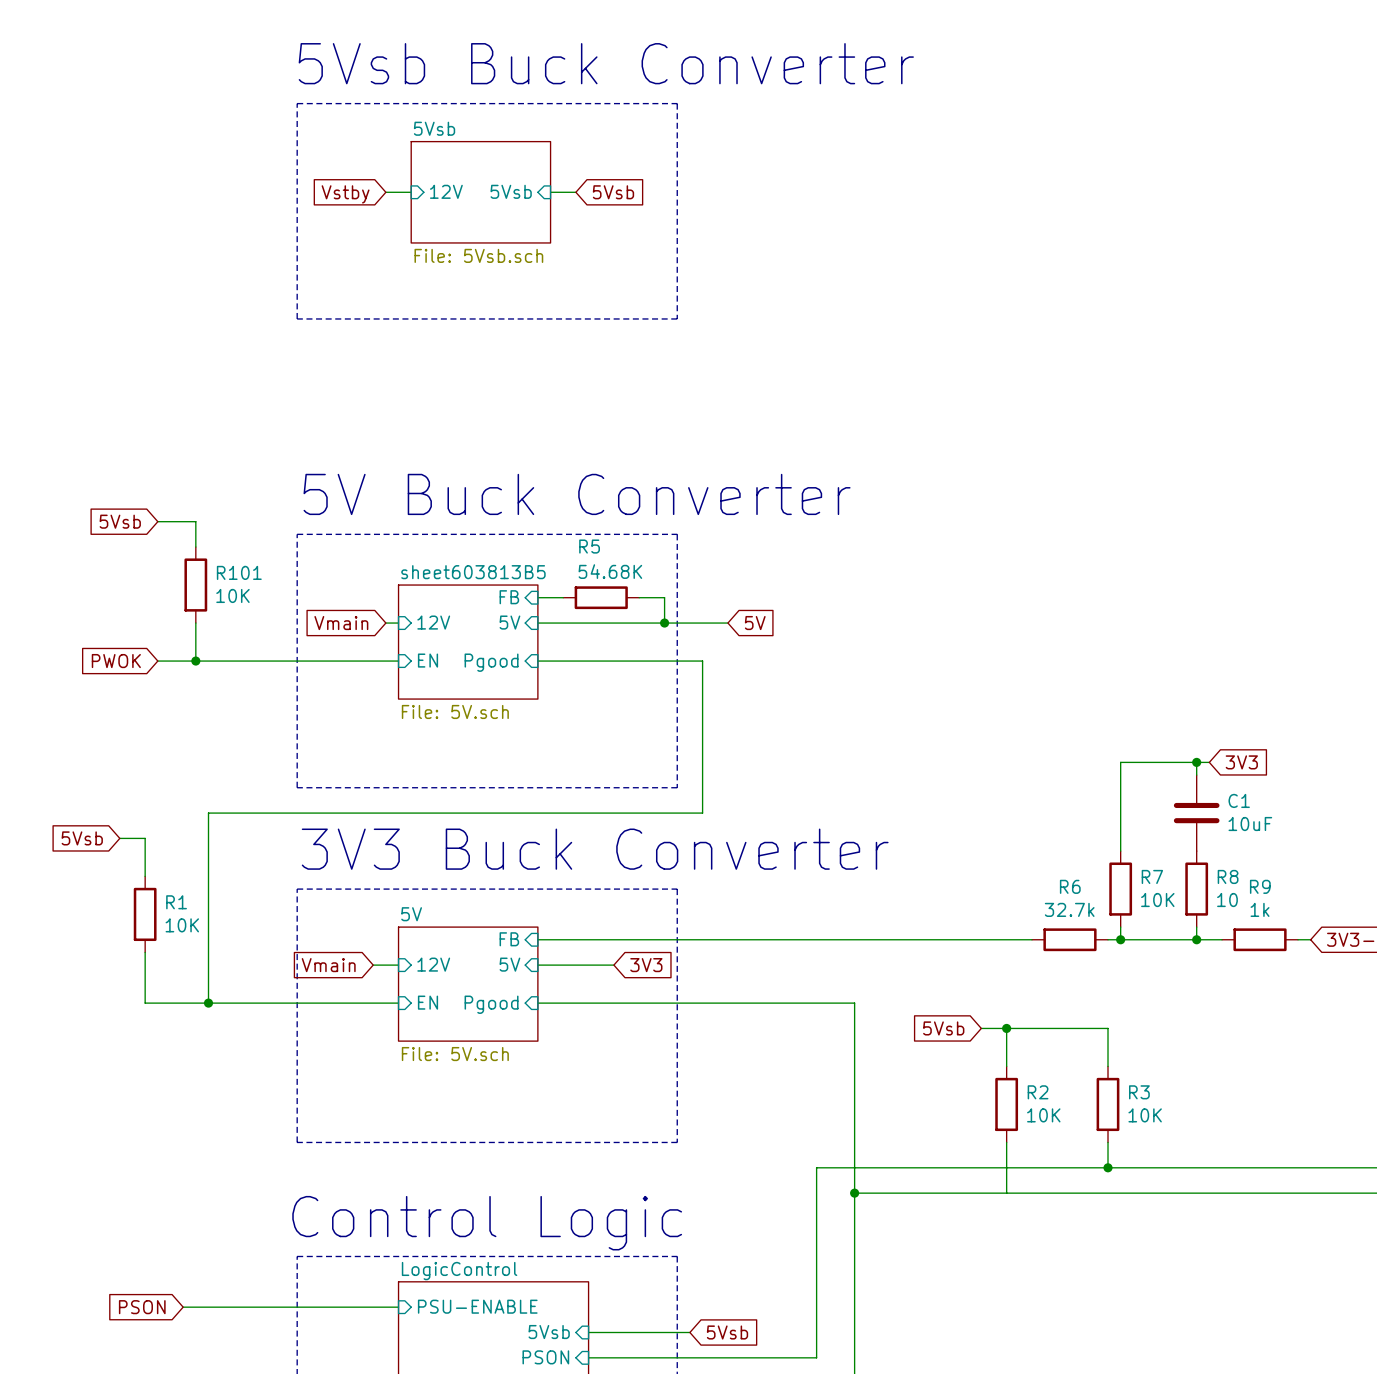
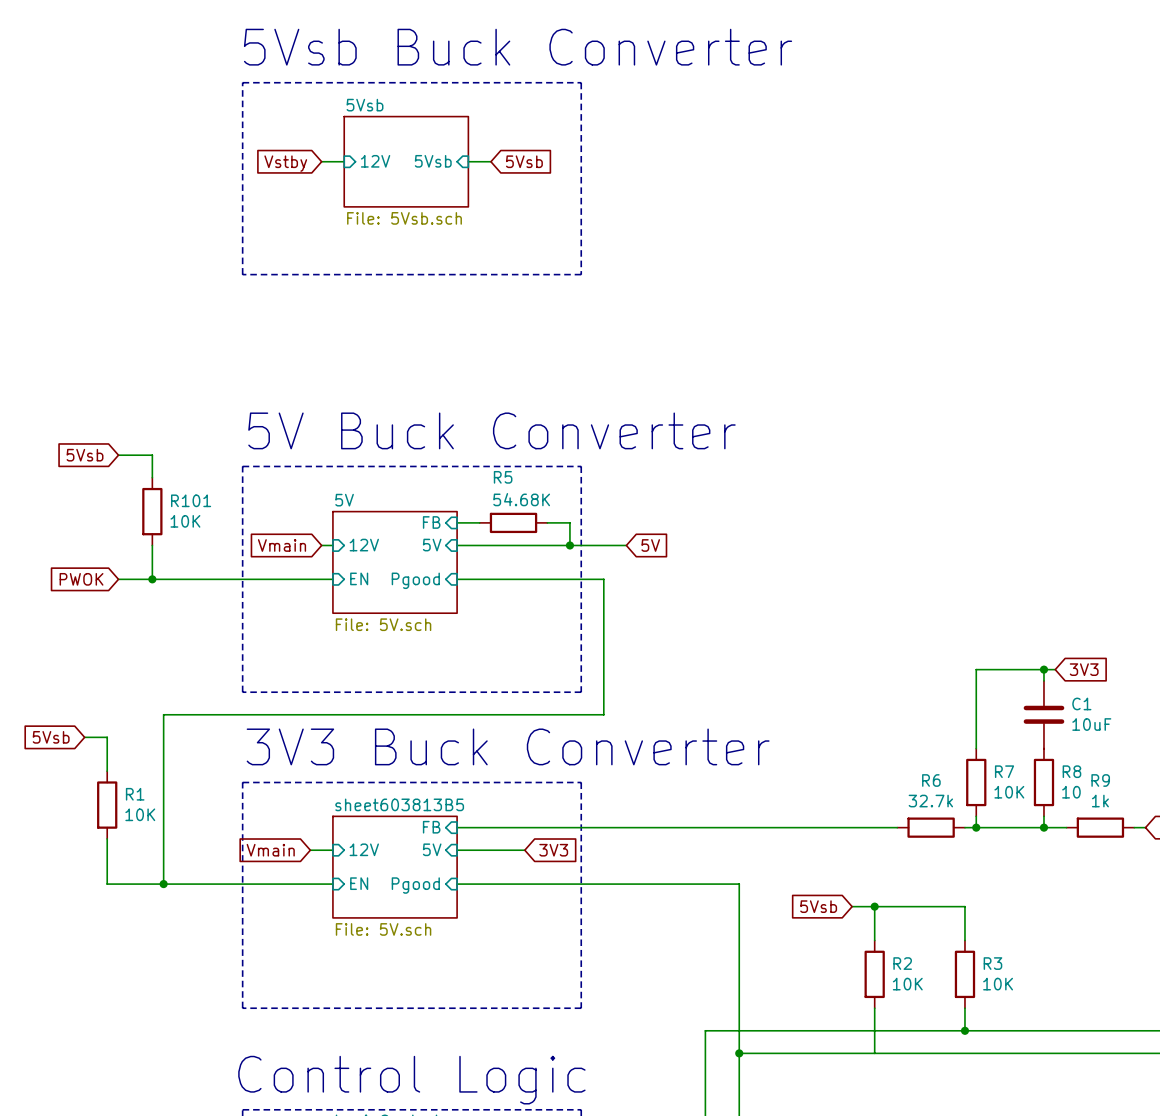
sheet sheet603813B5 name: sheet603813B5 (473, 572) -> 5V (344, 500)
sheet 5V name: 5V (411, 914) -> sheet603813B5 (399, 804)

